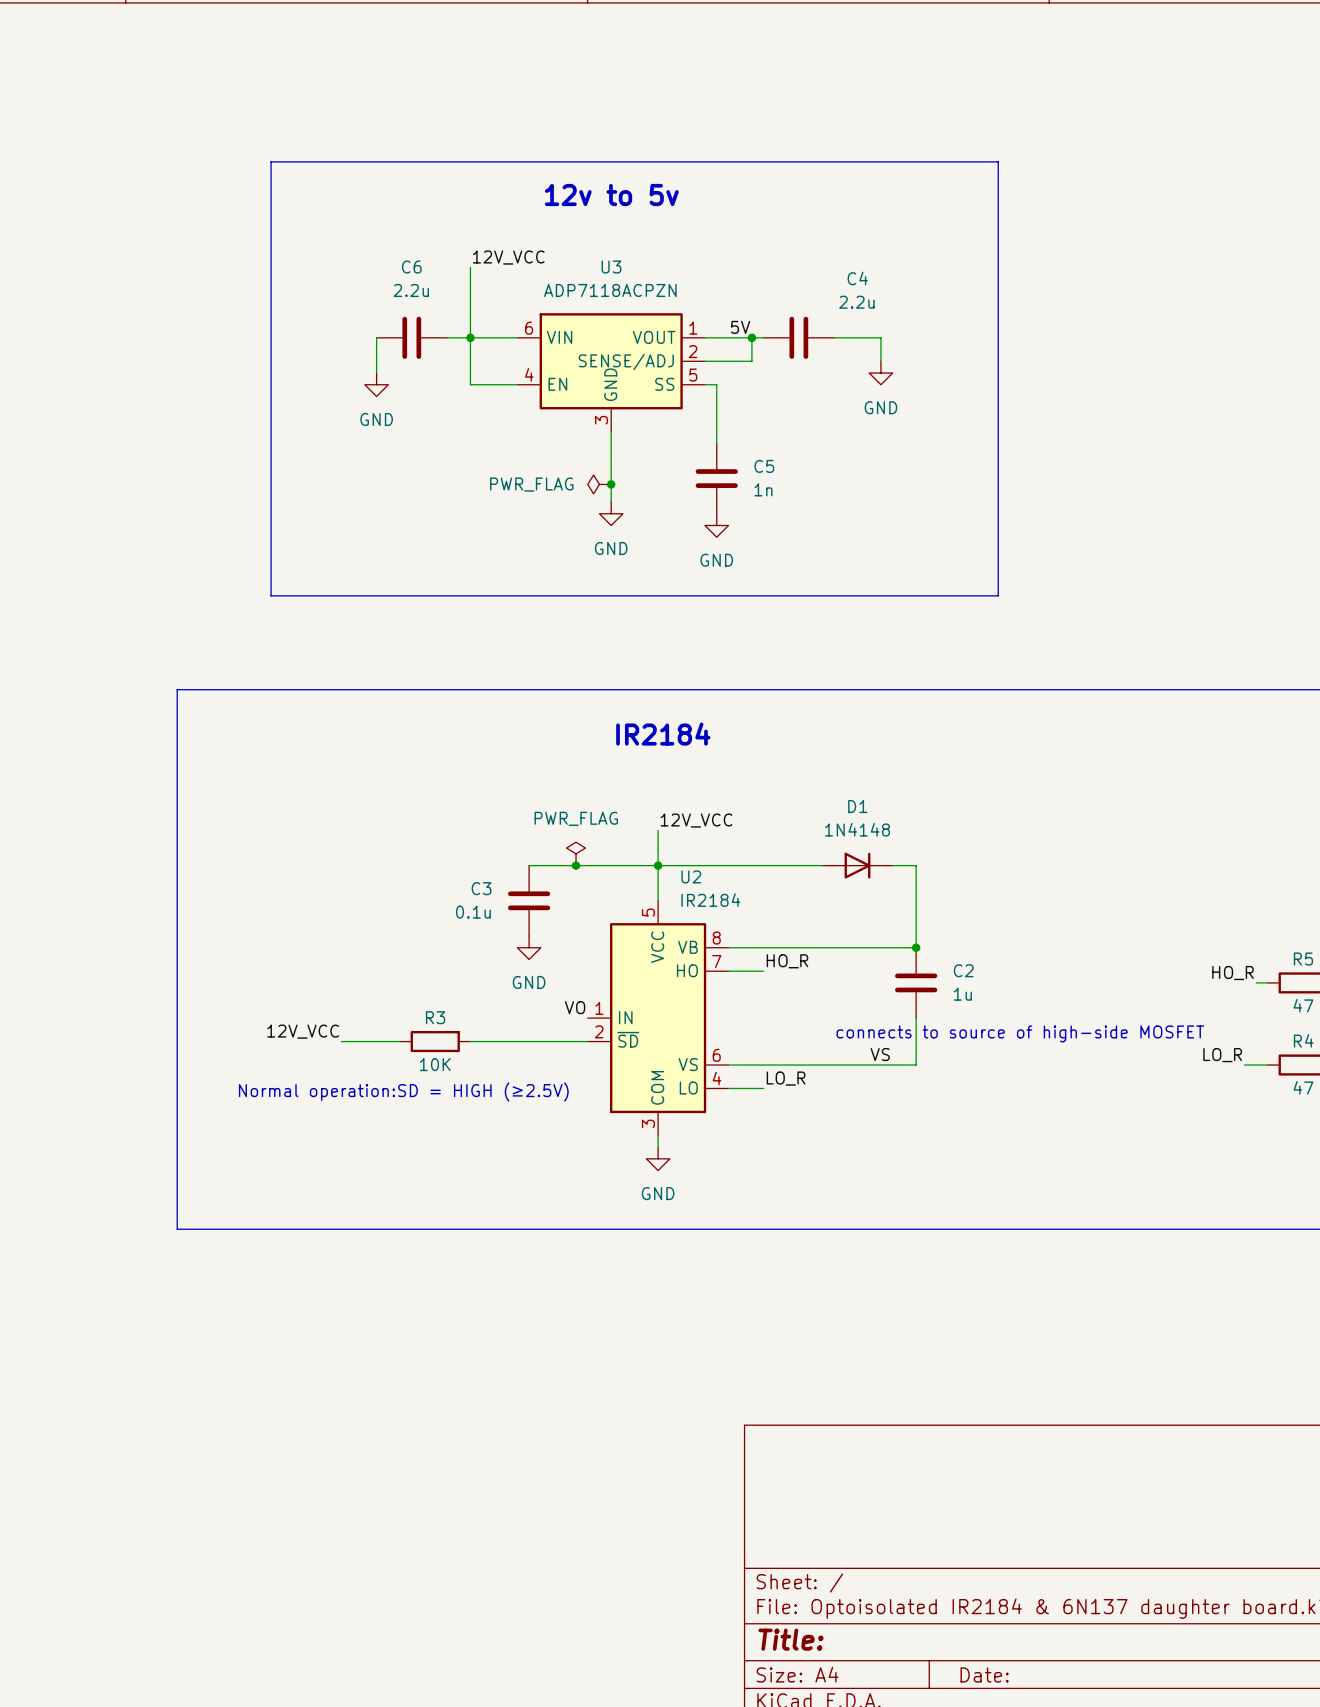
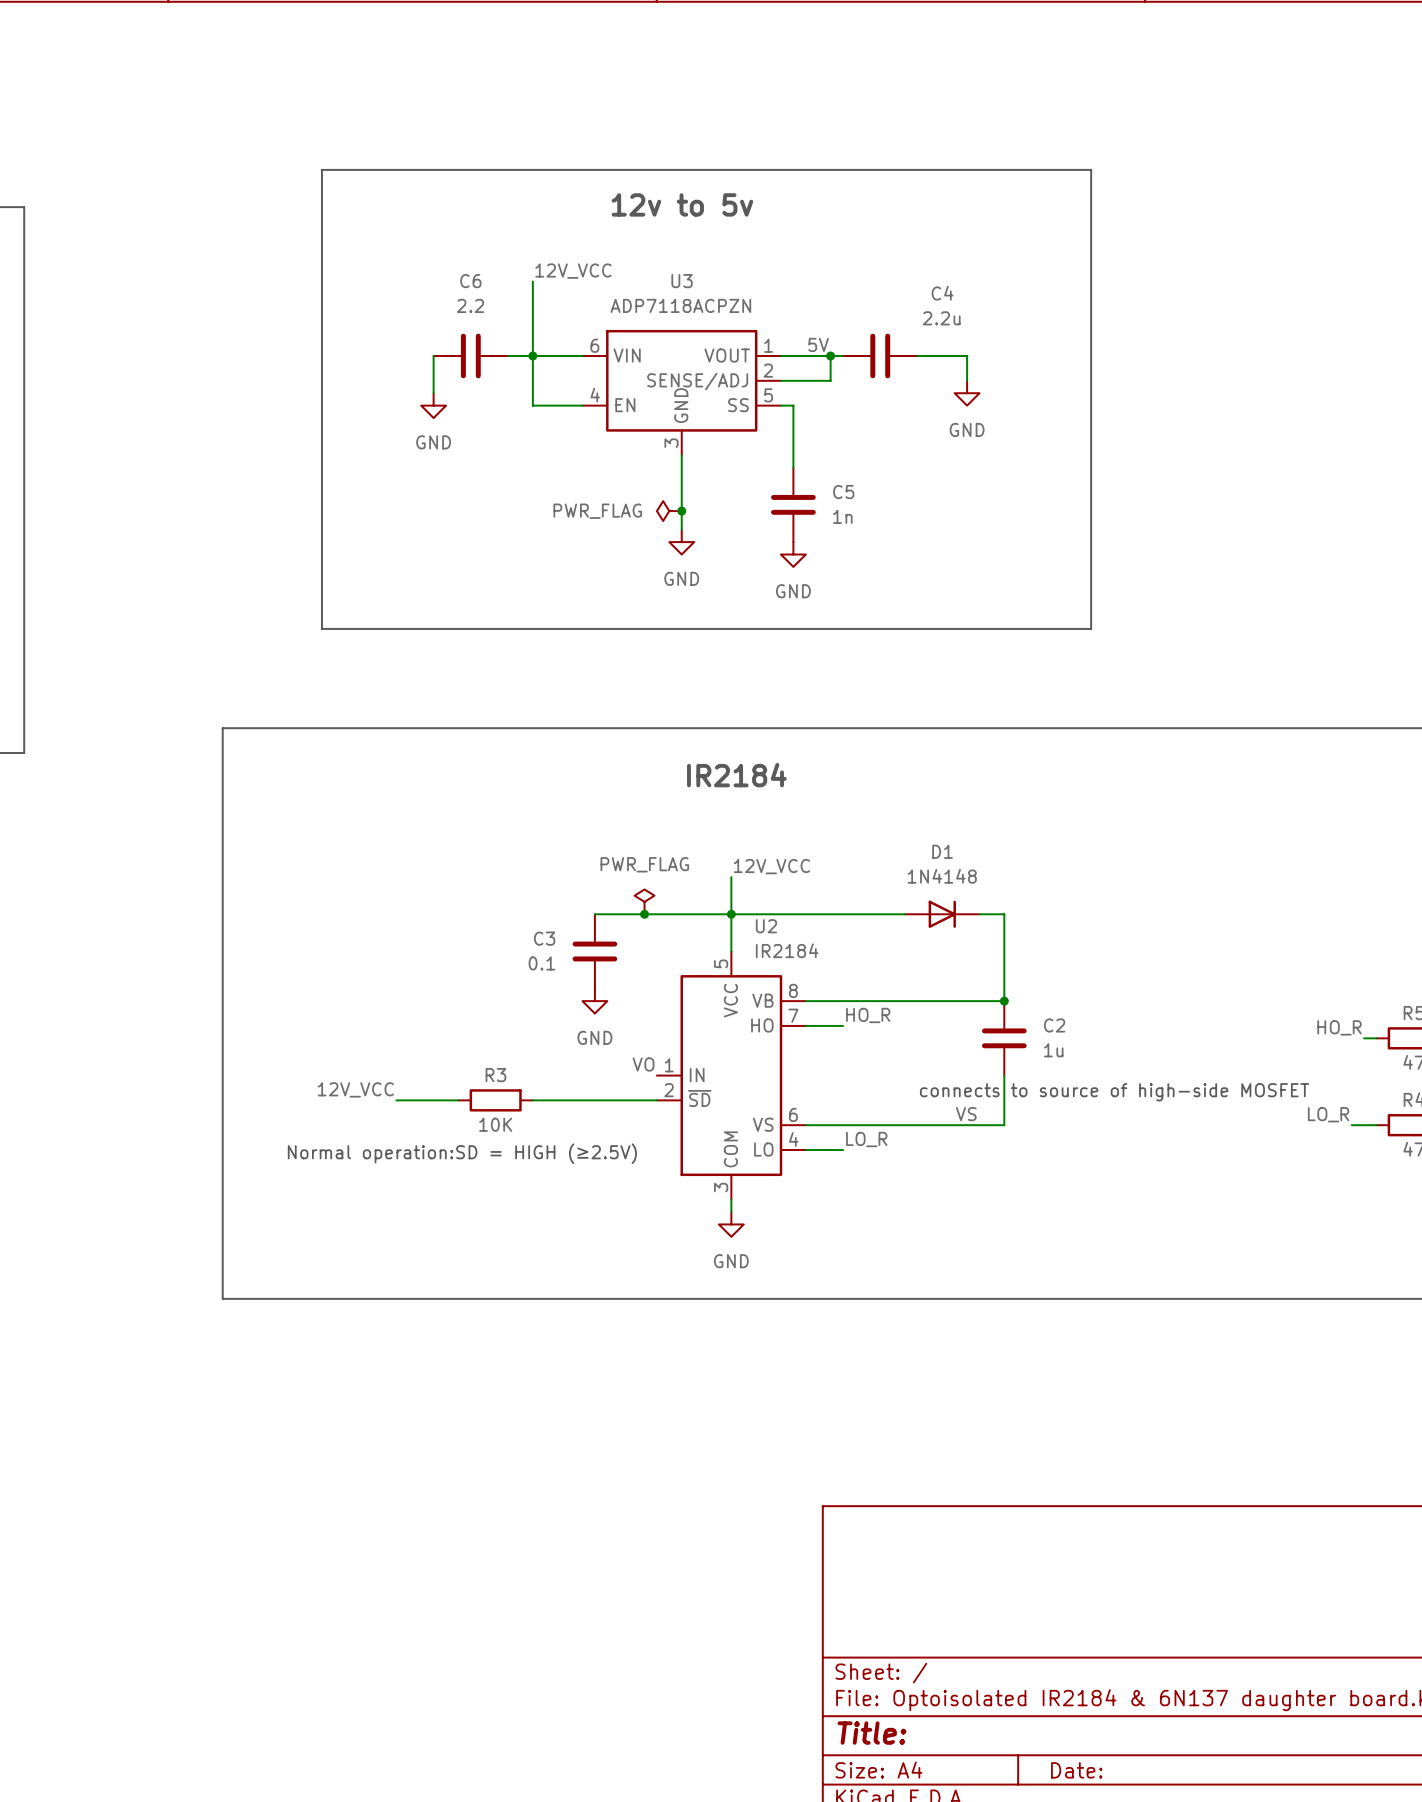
C6 value: 2.2u (411, 290) -> 2.2 (470, 305)
C3 value: 0.1u (473, 912) -> 0.1 (541, 963)

